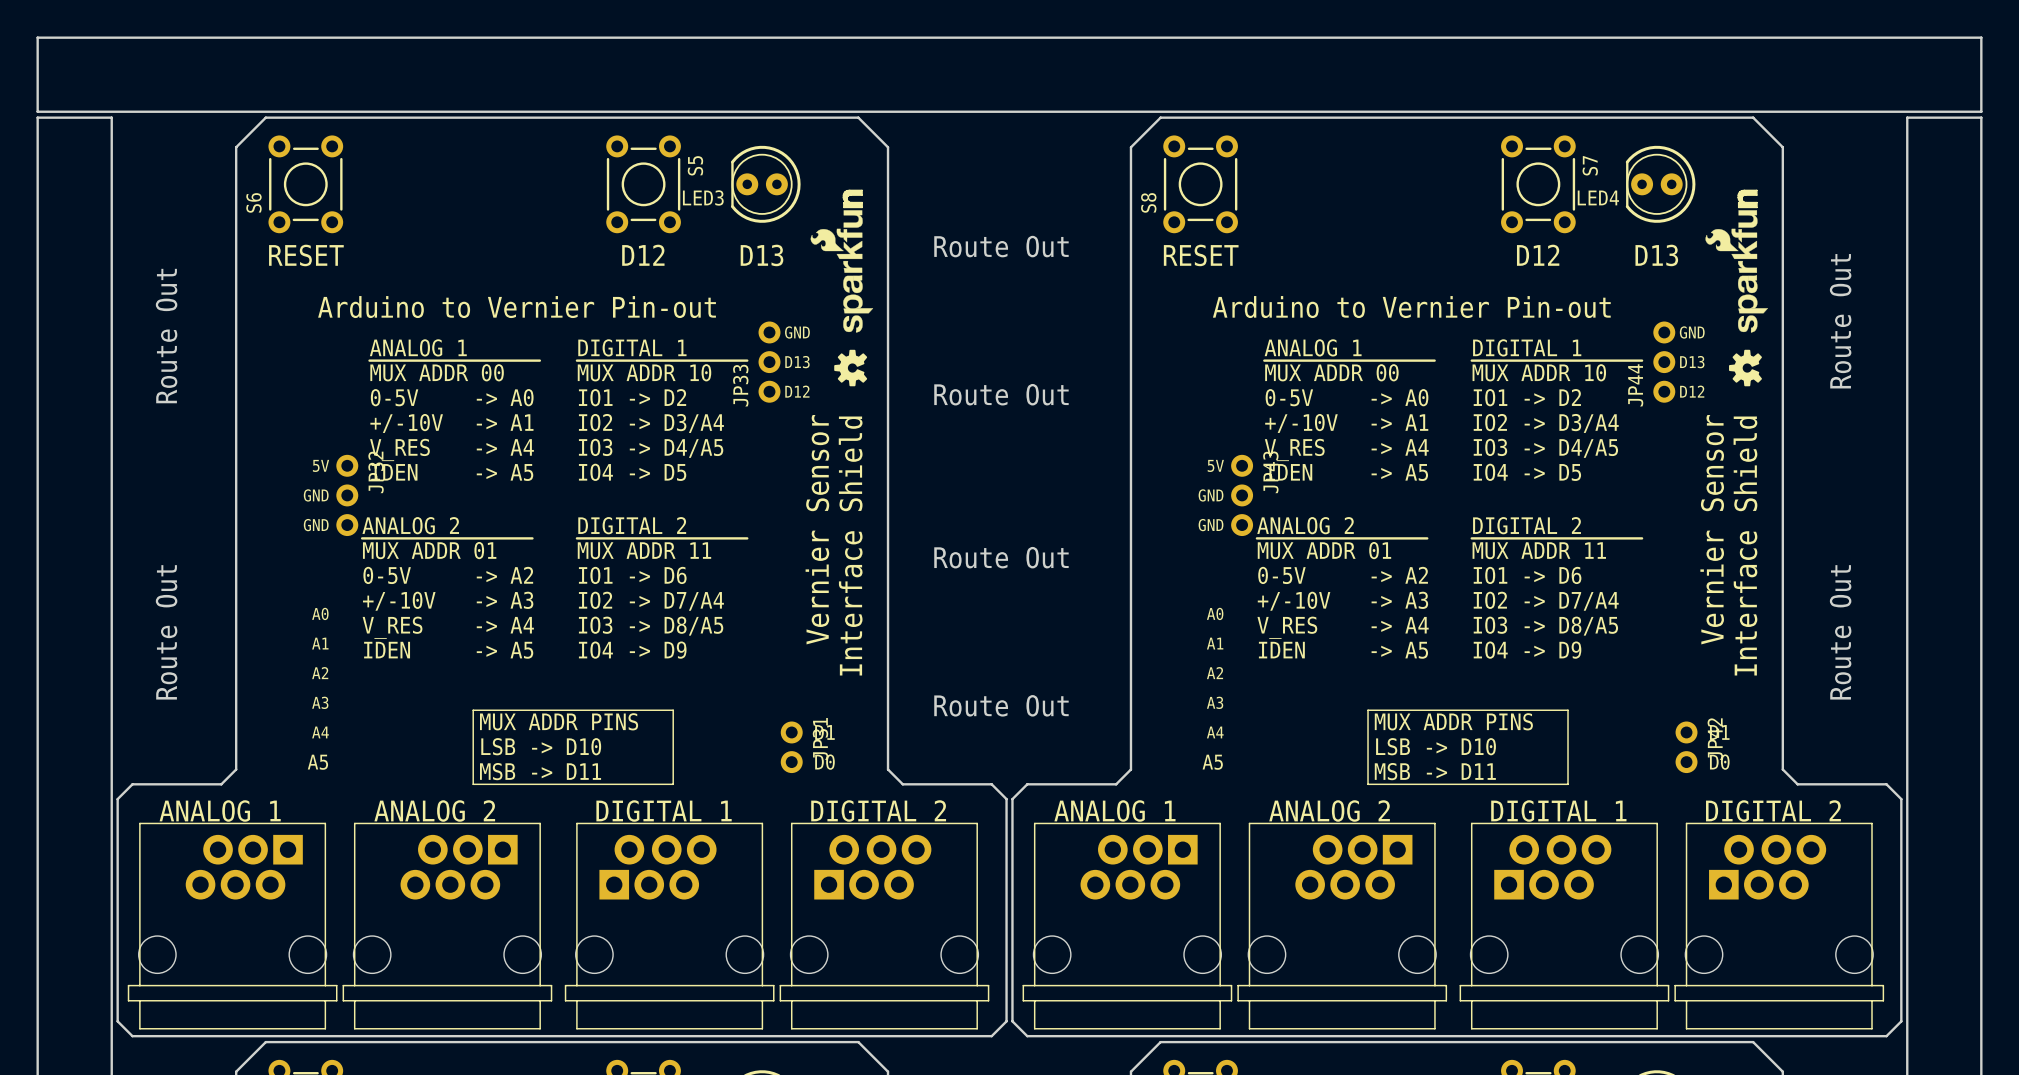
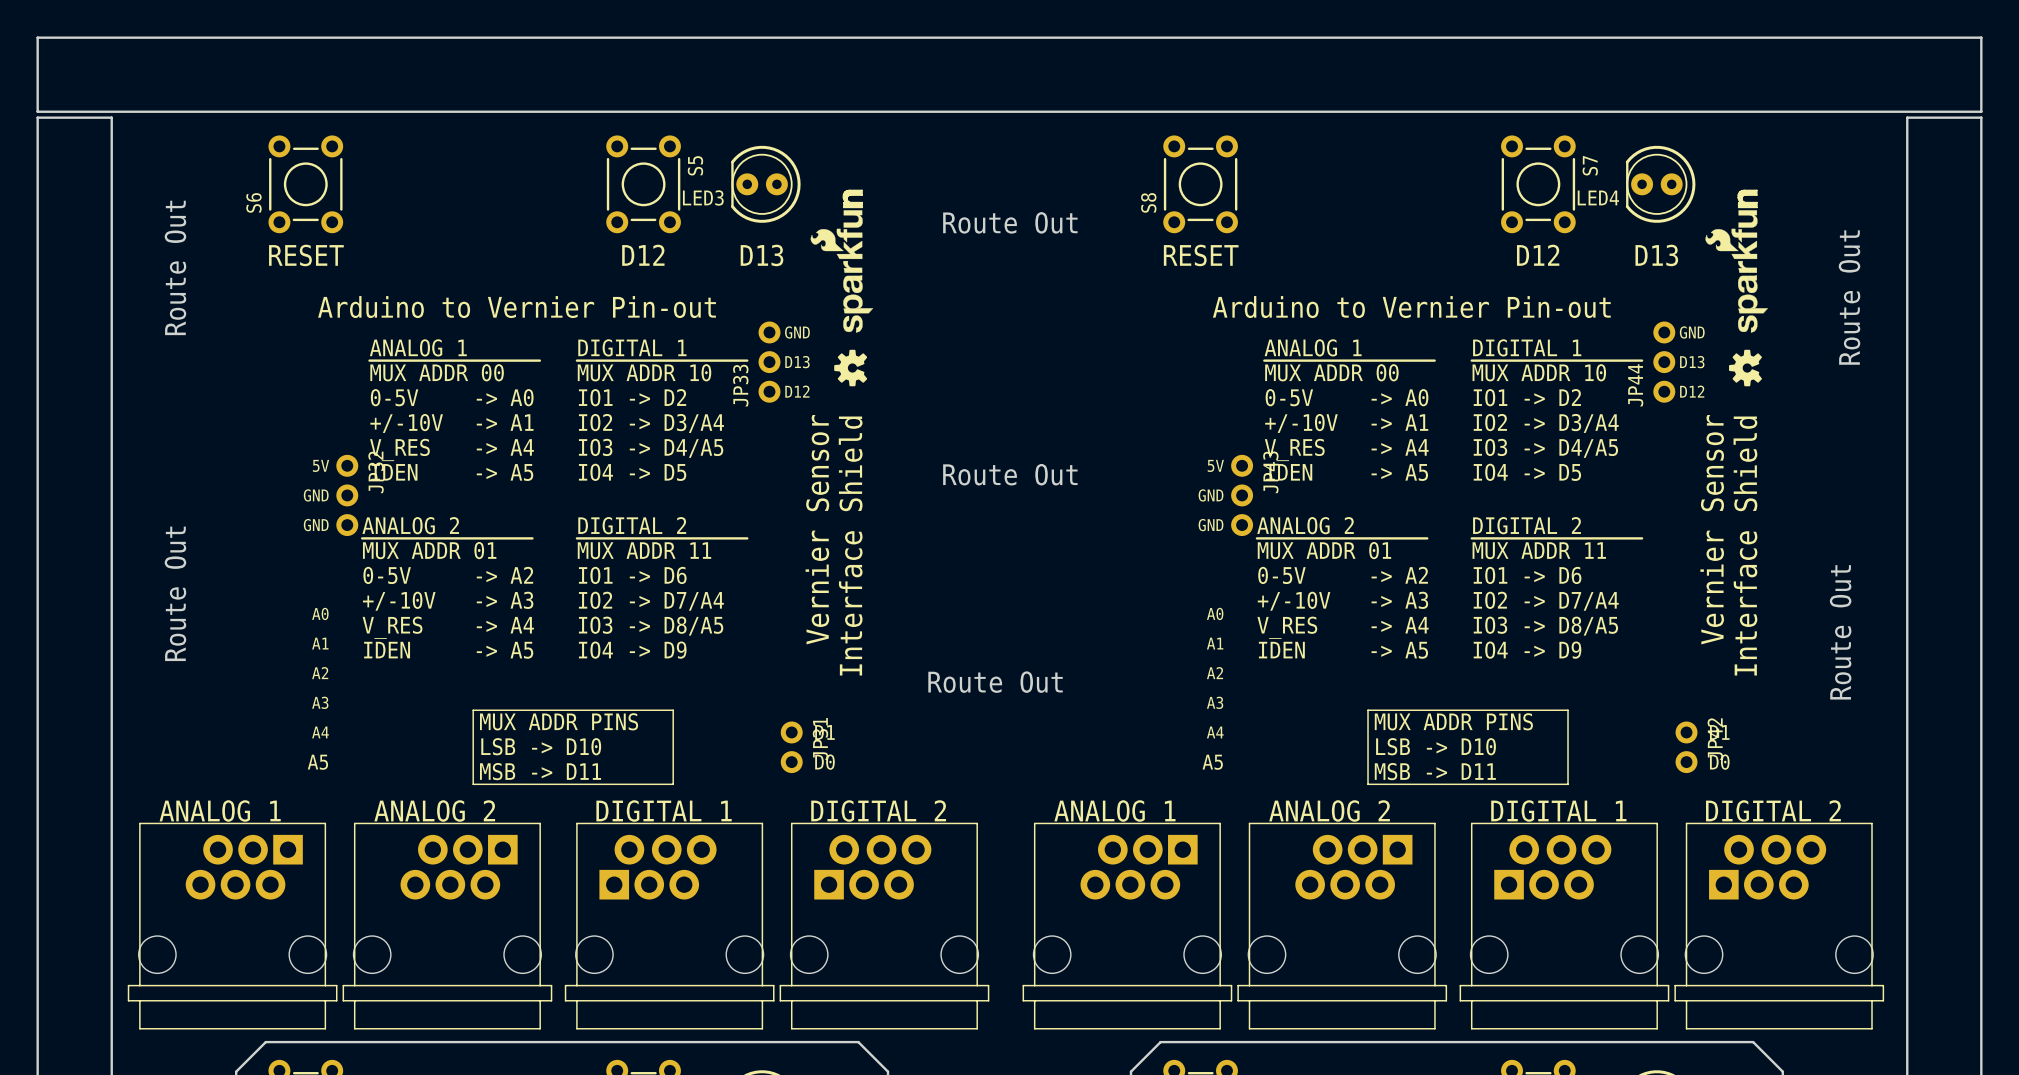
board edge: (265, 117) (236, 147) (236, 769) (221, 784) (132, 784) (117, 799) (117, 1021) (132, 1036) (991, 1036) (1006, 1021) (1006, 799) (991, 784) (902, 784) (888, 769) (888, 147) (858, 117) (265, 117) -> none
board edge: (1160, 117) (1753, 117) (1782, 147) (1782, 769) (1797, 784) (1886, 784) (1901, 799) (1901, 1021) (1886, 1036) (1027, 1036) (1012, 1021) (1012, 799) (1027, 784) (1116, 784) (1130, 769) (1130, 147) (1160, 117) -> none
text position: Route Out (1001, 246) -> Route Out (1010, 222)
text position: Route Out (1840, 321) -> Route Out (1849, 297)
text position: Route Out (166, 336) -> Route Out (175, 267)
text: Route Out (1001, 394) -> none
text: none -> Route Out (1010, 474)
text: Route Out (1001, 557) -> none
text position: Route Out (166, 632) -> Route Out (175, 593)
text position: Route Out (1001, 705) -> Route Out (995, 682)

